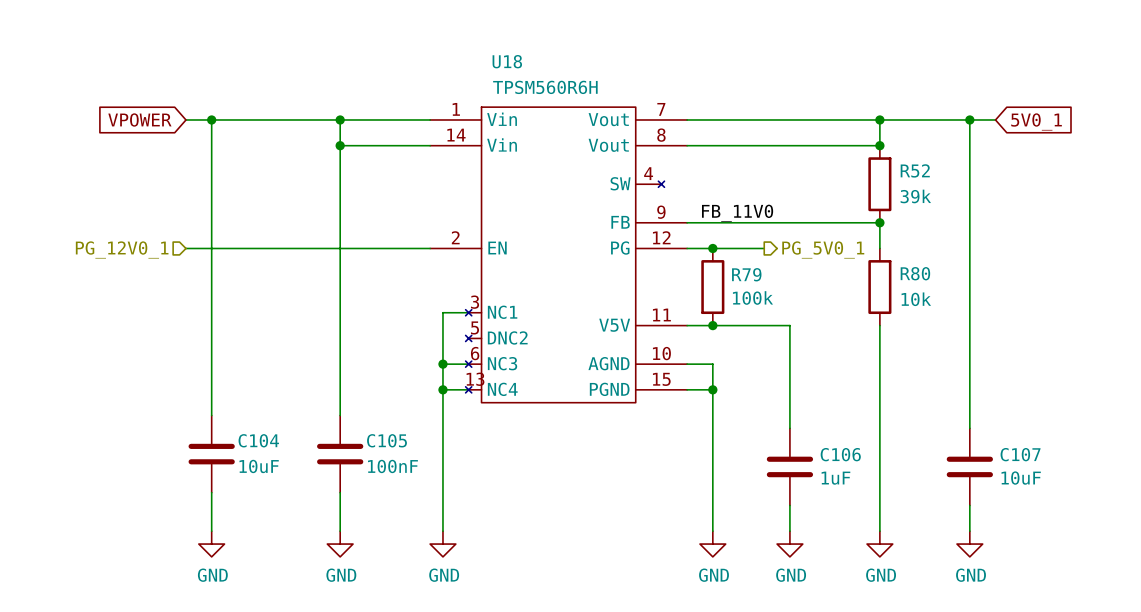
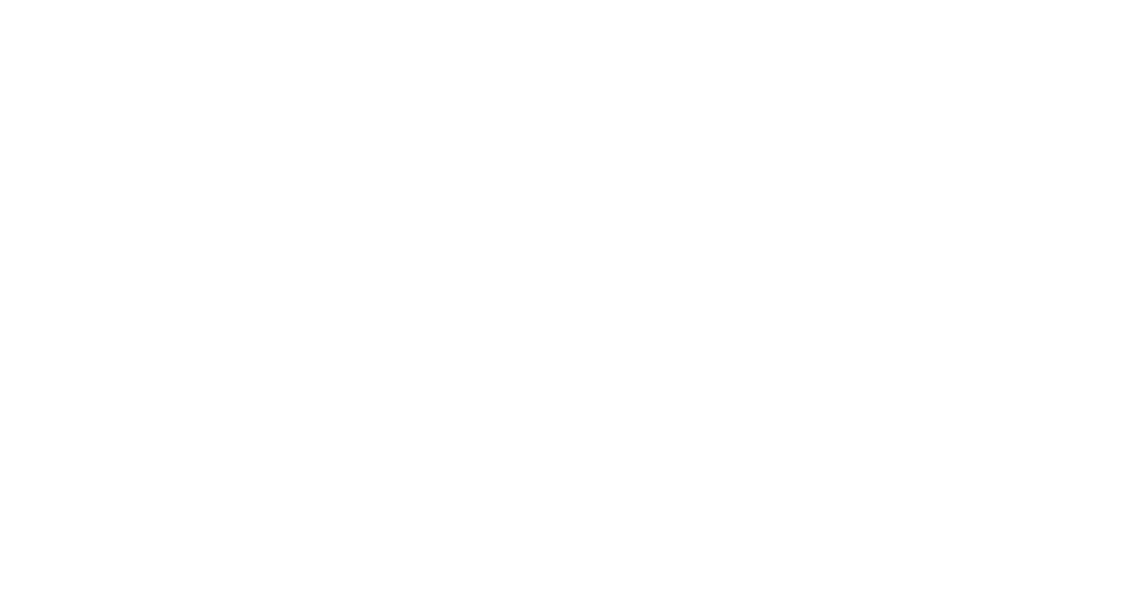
wire: (185, 119) (430, 119) -> none
wire: (211, 119) (211, 415) -> none
junction: (211, 119) -> none
wire: (340, 119) (340, 415) -> none
junction: (340, 119) -> none
wire: (687, 119) (995, 119) -> none
wire: (879, 119) (879, 145) (687, 145) -> none
junction: (879, 119) -> none
wire: (969, 119) (969, 428) -> none
junction: (969, 119) -> none
global label: VPOWER (139, 120) -> none
global label: 5V0_1 (1036, 121) -> none
wire: (340, 145) (430, 145) -> none
junction: (340, 145) -> none
junction: (879, 145) -> none
R52: 39k (879, 184) -> none
label: FB_11V0 (737, 213) -> none
wire: (687, 222) (879, 222) (879, 248) -> none
junction: (879, 222) -> none
wire: (185, 248) (430, 248) -> none
wire: (687, 248) (764, 248) -> none
junction: (712, 248) -> none
hierarchical label: PG_12V0_1 (122, 249) -> none
hierarchical label: PG_5V0_1 (823, 249) -> none
U18: TPSM560R6H (578, 254) -> none
R79: 100k (712, 287) -> none
R80: 10k (879, 287) -> none
wire: (468, 312) (442, 312) (442, 531) -> none
wire: (687, 325) (789, 325) (789, 428) -> none
junction: (712, 325) -> none
wire: (879, 325) (879, 531) -> none
wire: (442, 364) (468, 364) -> none
junction: (442, 364) -> none
wire: (687, 364) (712, 364) (712, 531) -> none
wire: (442, 389) (468, 389) -> none
junction: (442, 389) -> none
wire: (687, 389) (712, 389) -> none
junction: (712, 389) -> none
C104: 10uF (211, 454) -> none
C105: 100nF (340, 454) -> none
C106: 1uF (789, 466) -> none
C107: 10uF (969, 466) -> none
wire: (211, 492) (211, 531) -> none
wire: (340, 492) (340, 531) -> none
wire: (789, 505) (789, 531) -> none
wire: (969, 505) (969, 531) -> none
power symbol: GND (211, 544) -> none
power symbol: GND (340, 544) -> none
power symbol: GND (442, 544) -> none
power symbol: GND (712, 544) -> none
power symbol: GND (789, 544) -> none
power symbol: GND (879, 544) -> none
power symbol: GND (969, 544) -> none

